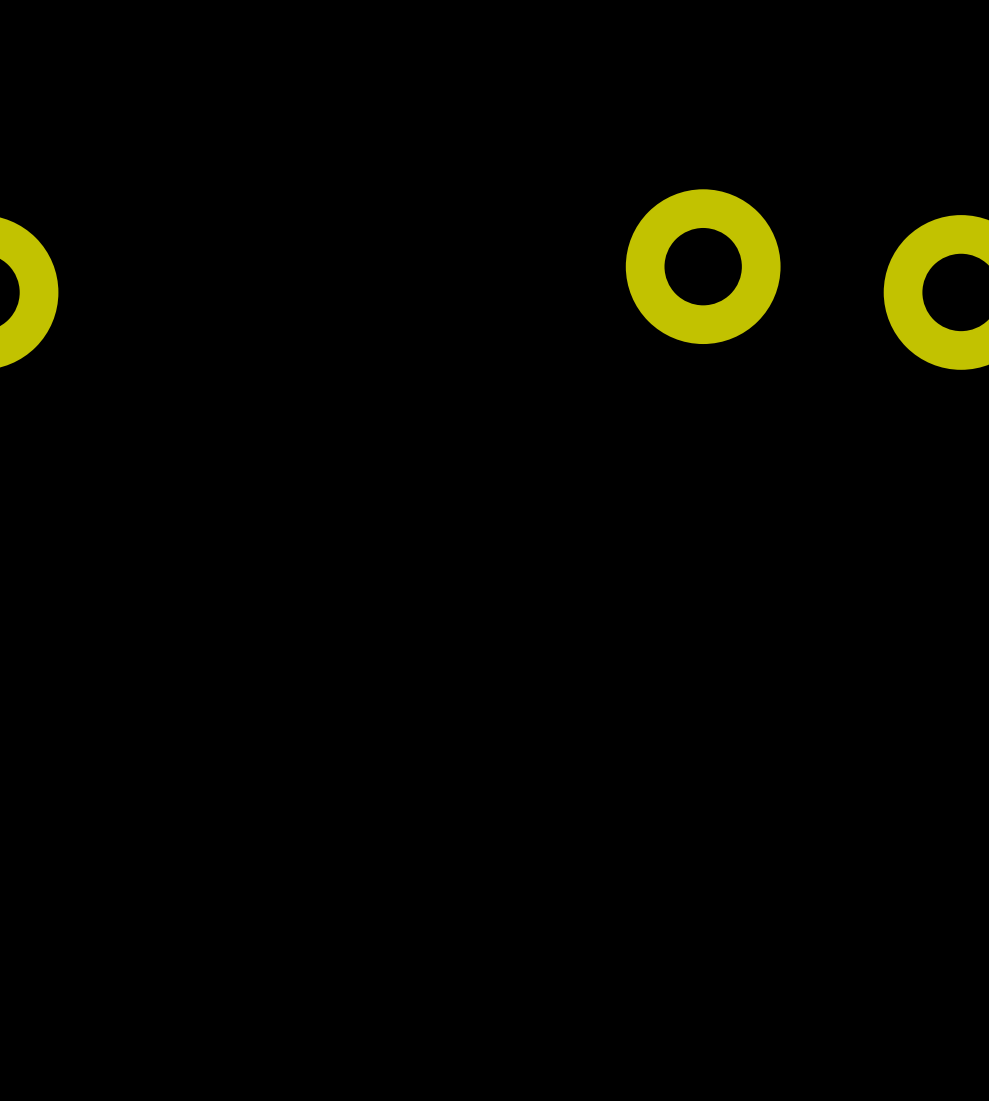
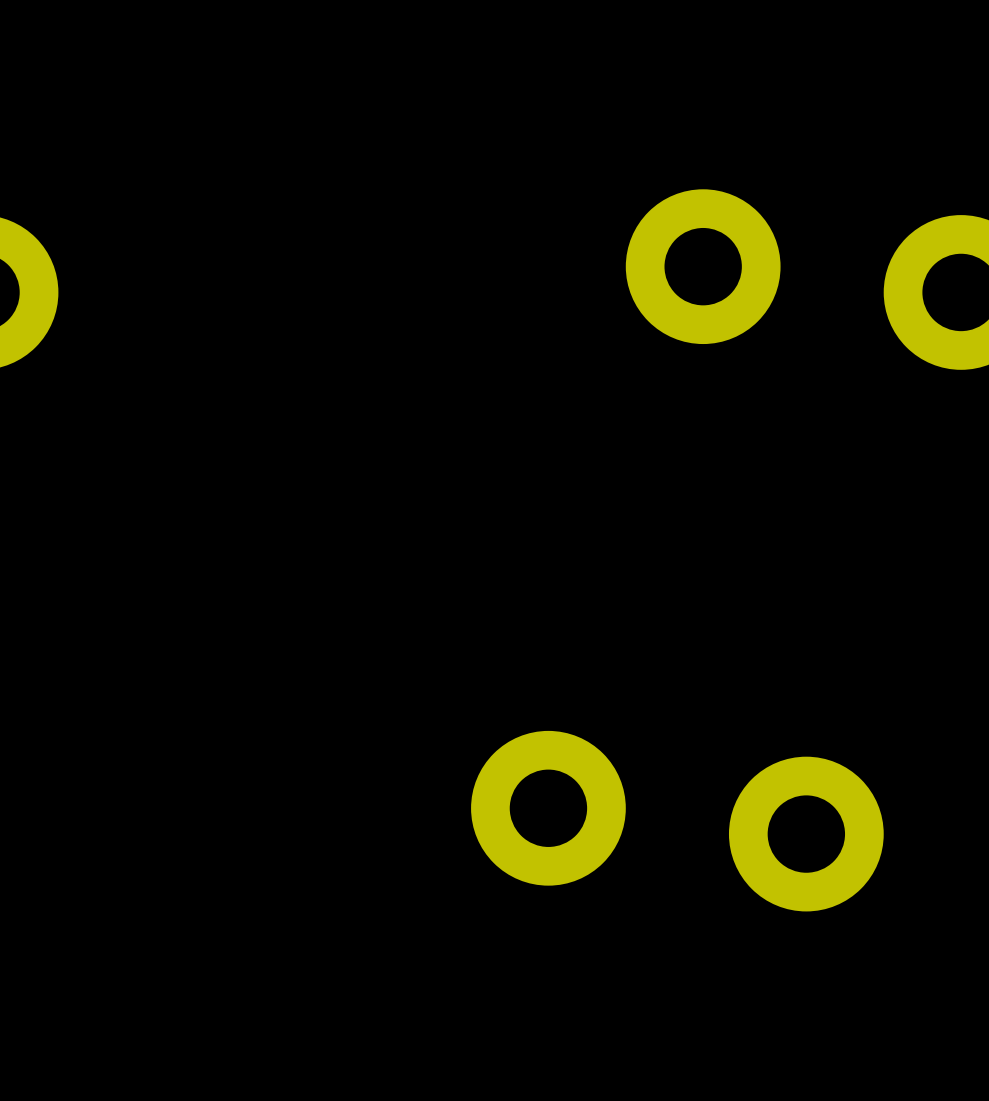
part: none -> (677, 821)

